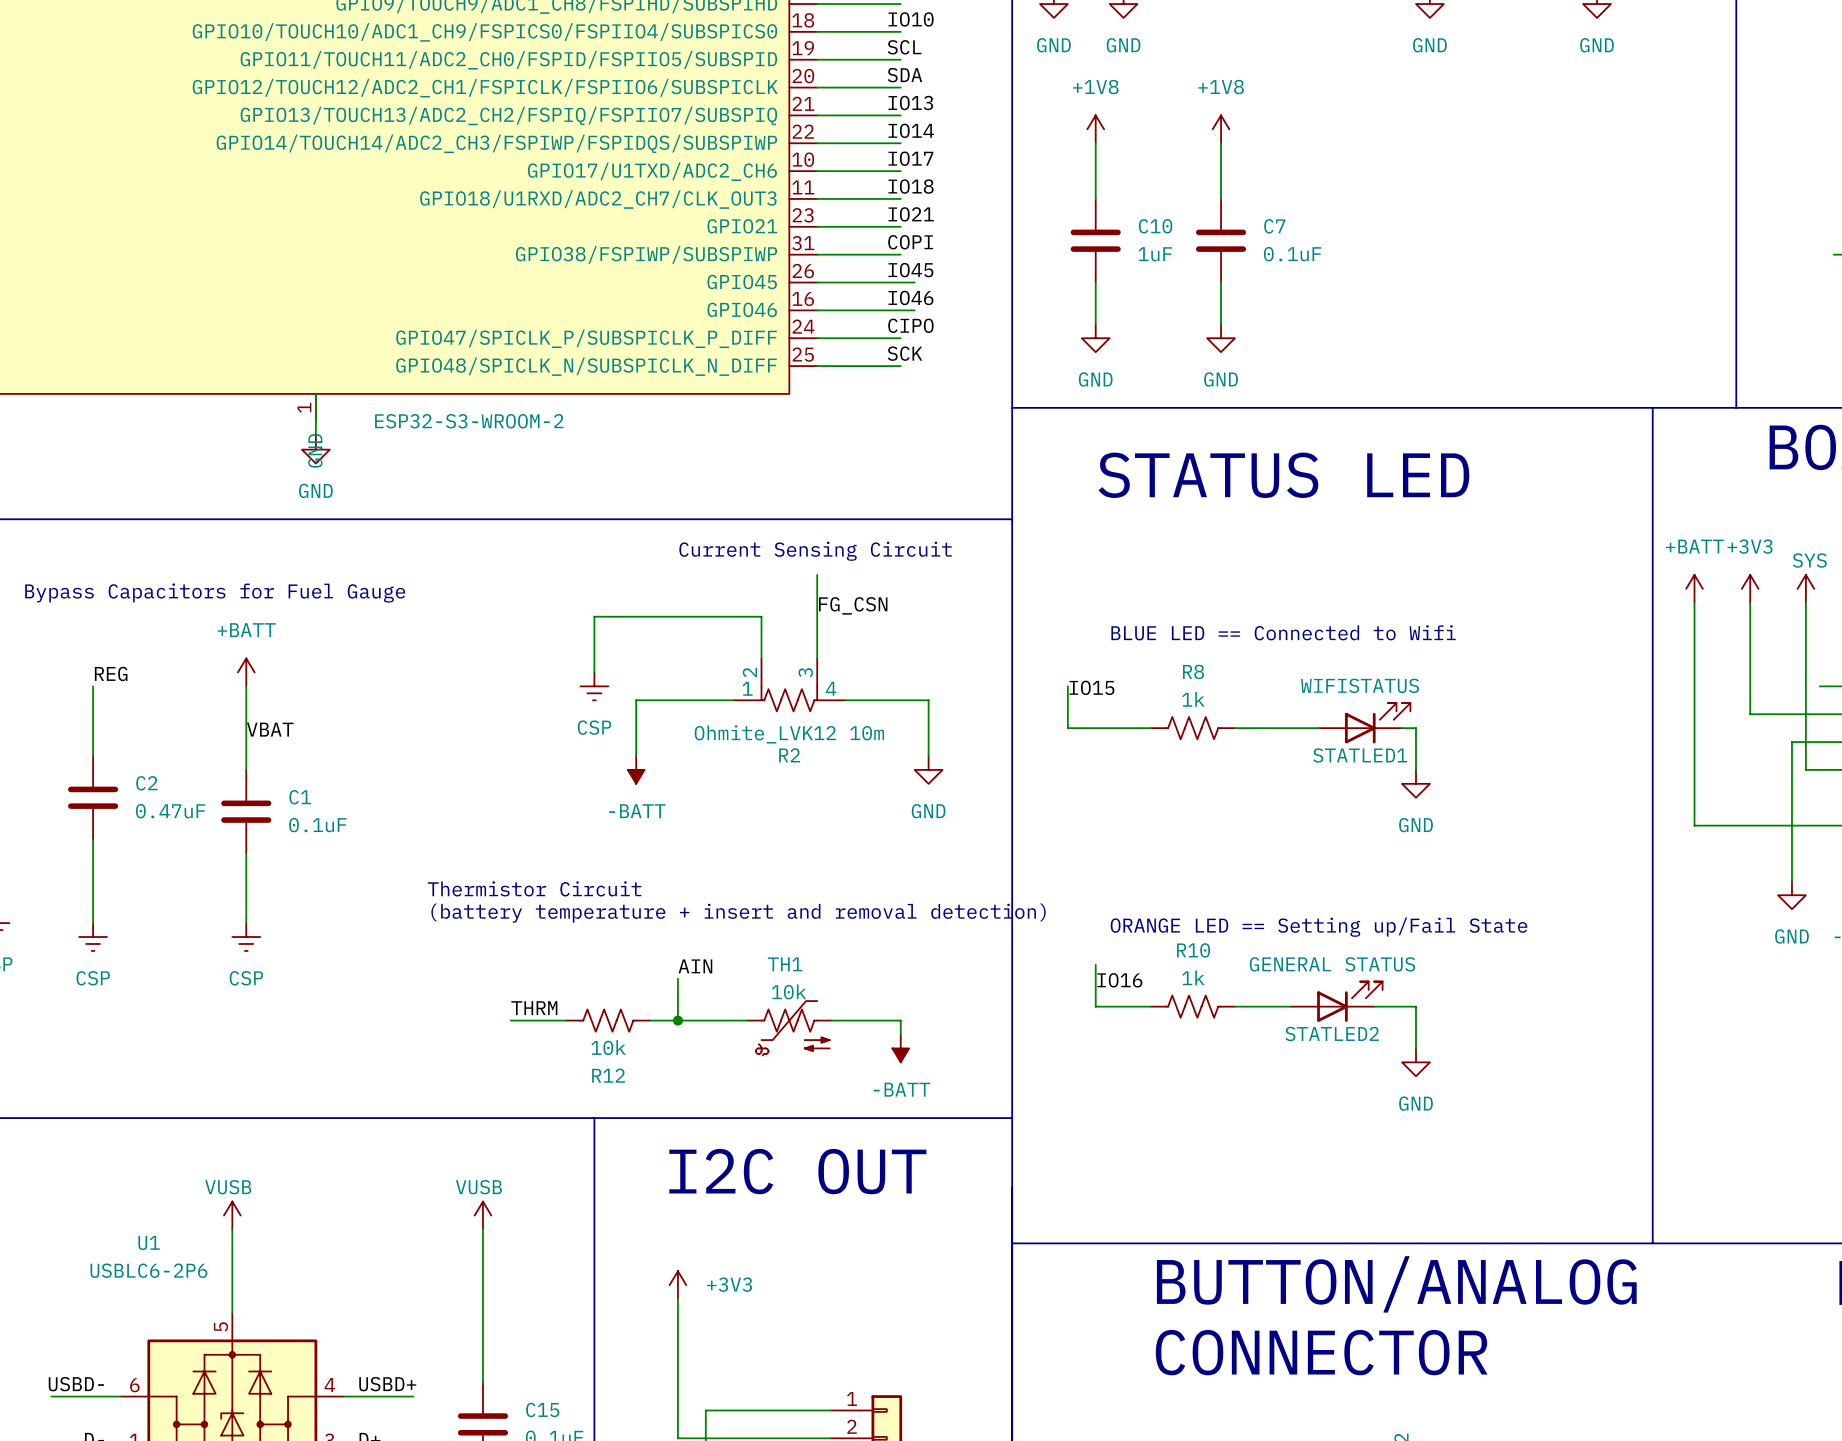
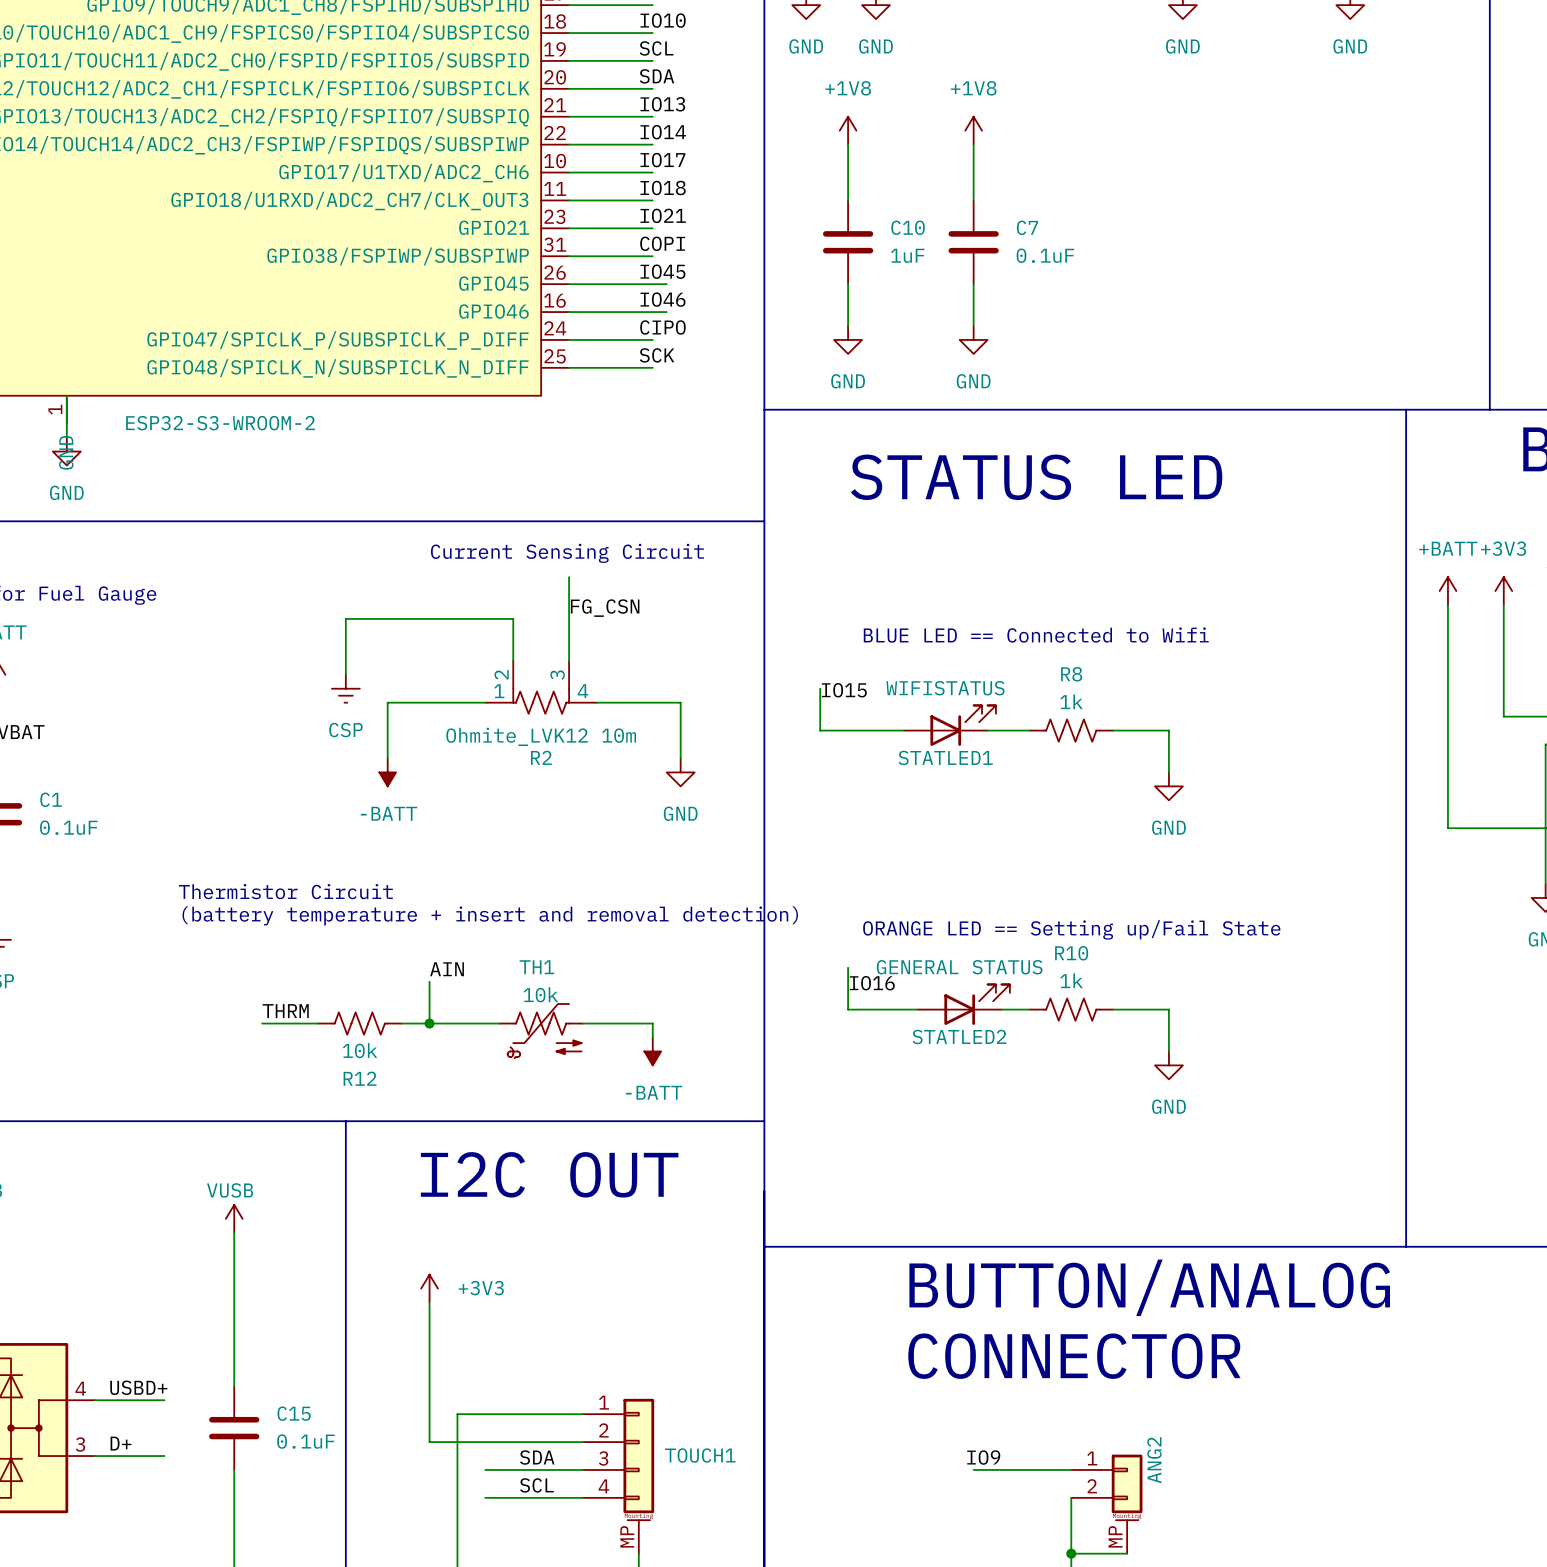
STATLED1 position: (1364, 723) -> (949, 725)
R8 position: (1193, 728) -> (1071, 730)
STATLED2 position: (1336, 1001) -> (963, 1004)
R10 position: (1193, 1006) -> (1071, 1009)

